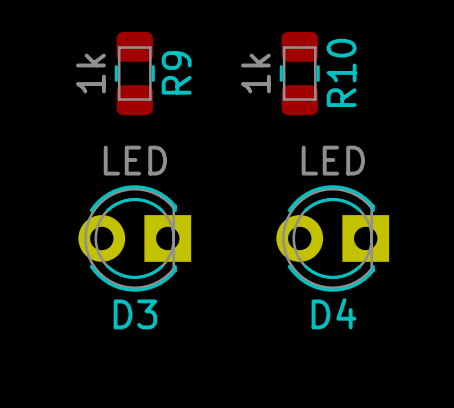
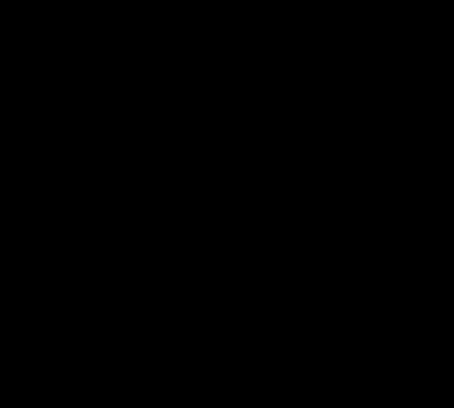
R9: 1k (134, 73) -> none
R10: 1k (299, 73) -> none
D3: LED (134, 238) -> none
D4: LED (332, 238) -> none

